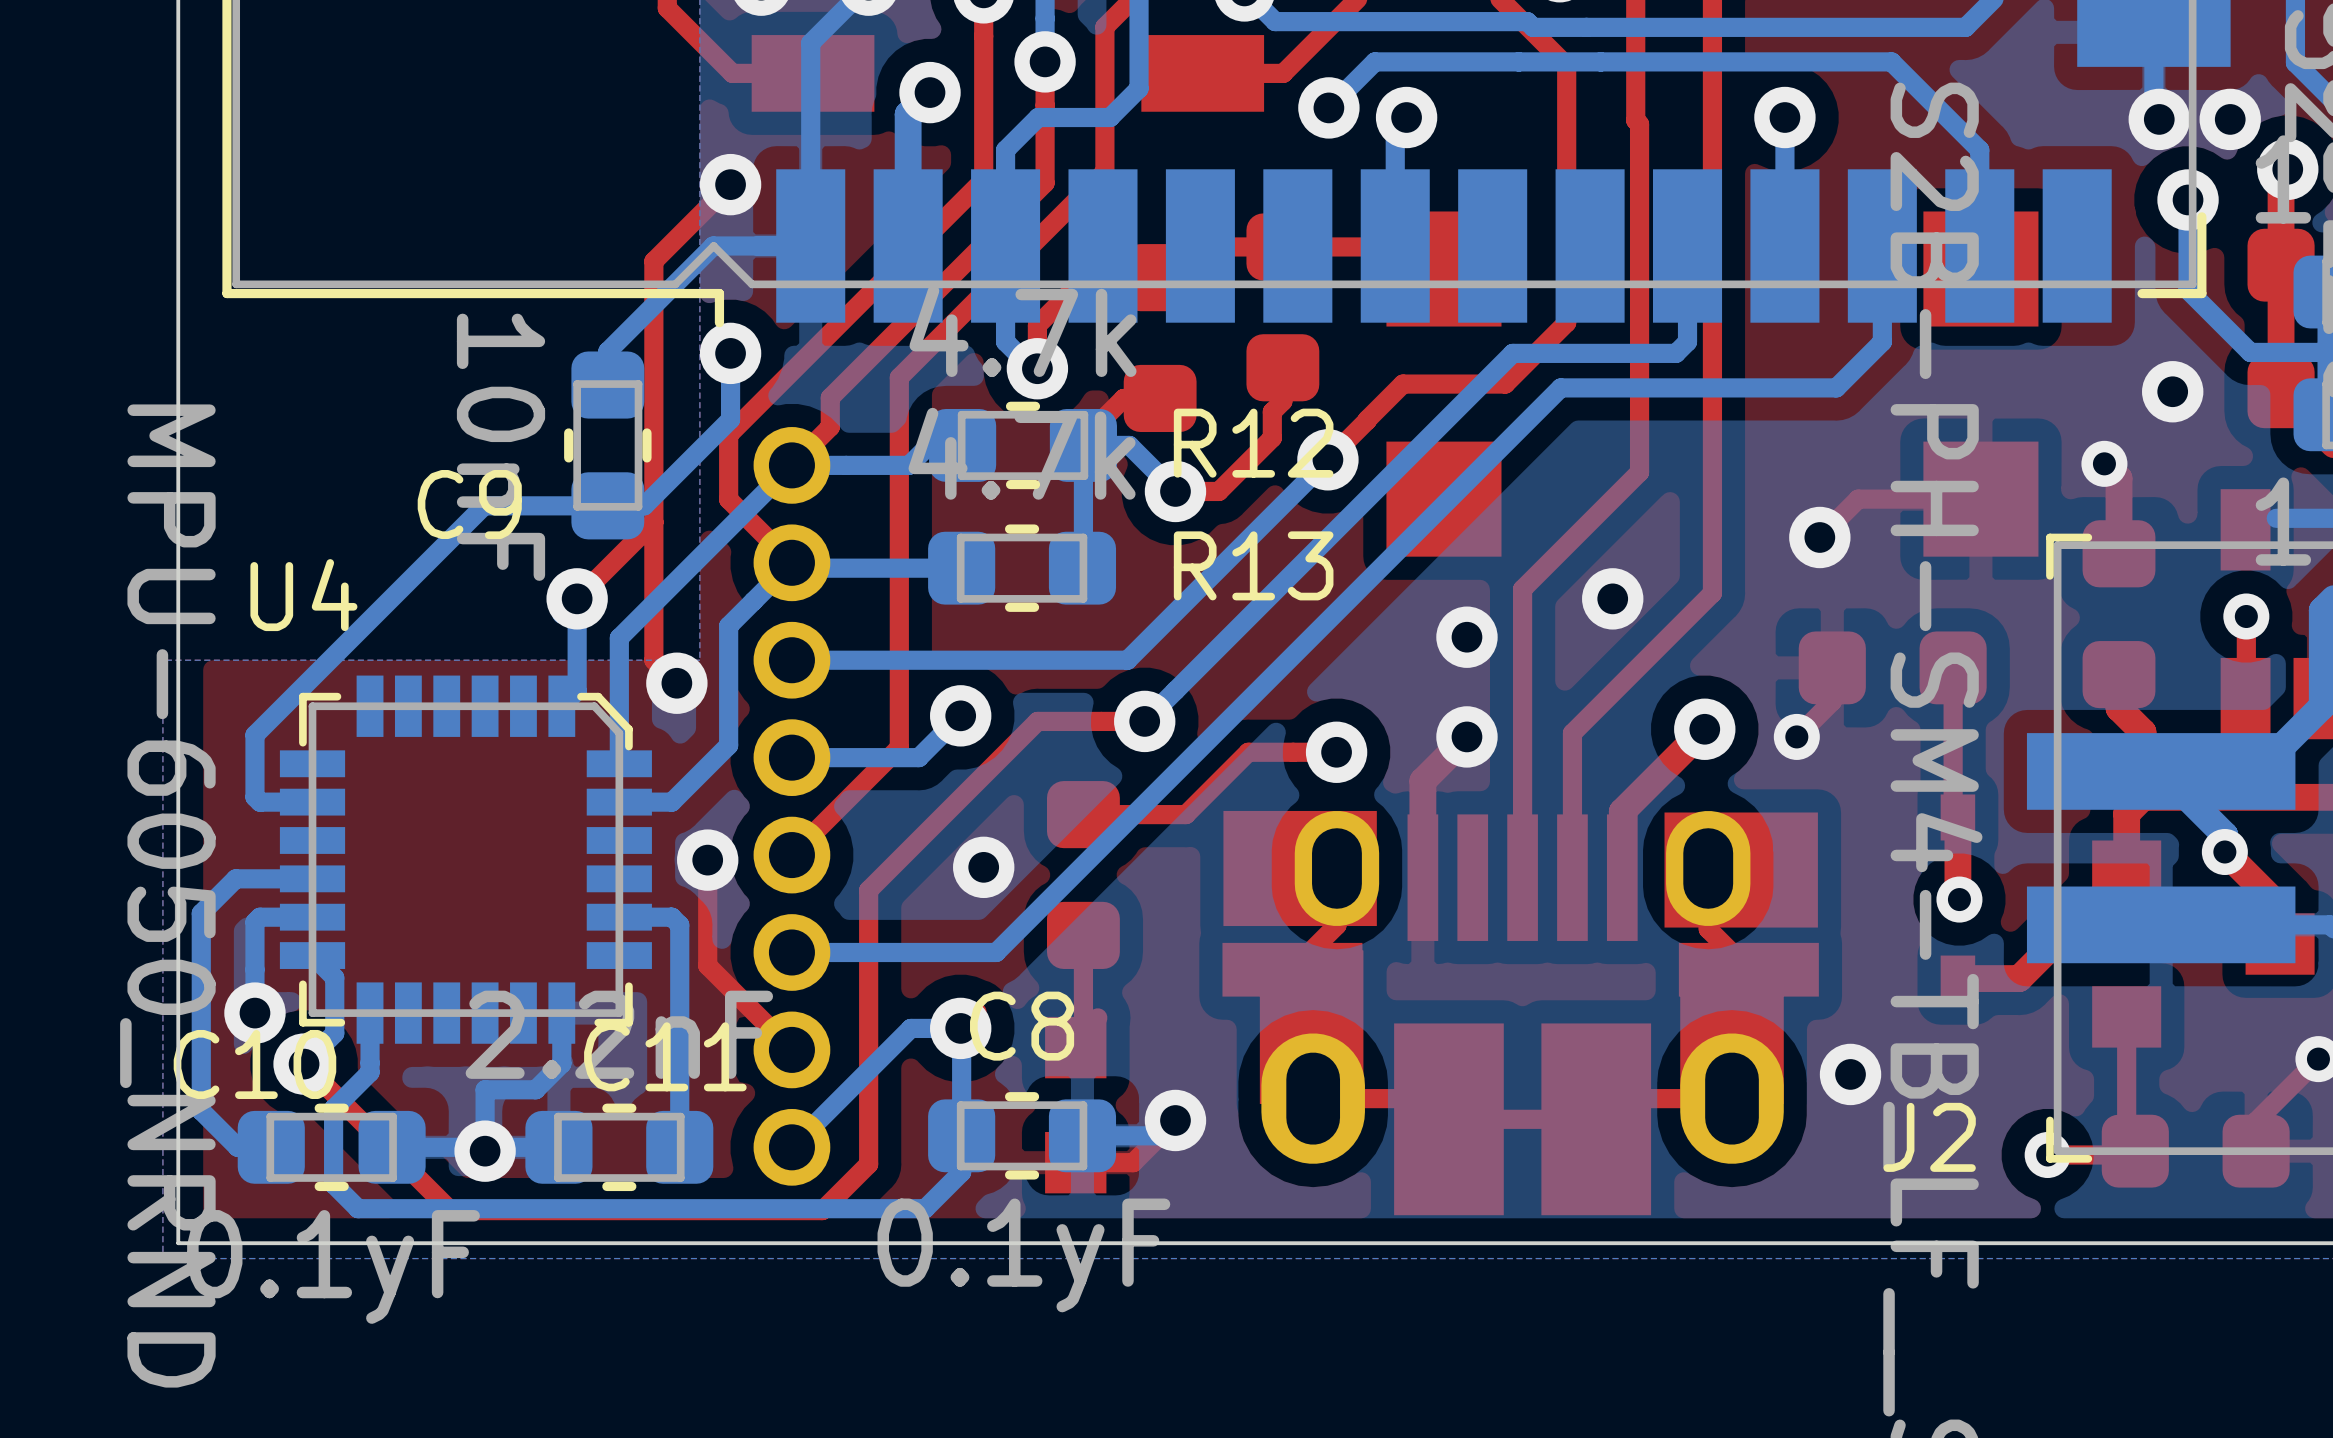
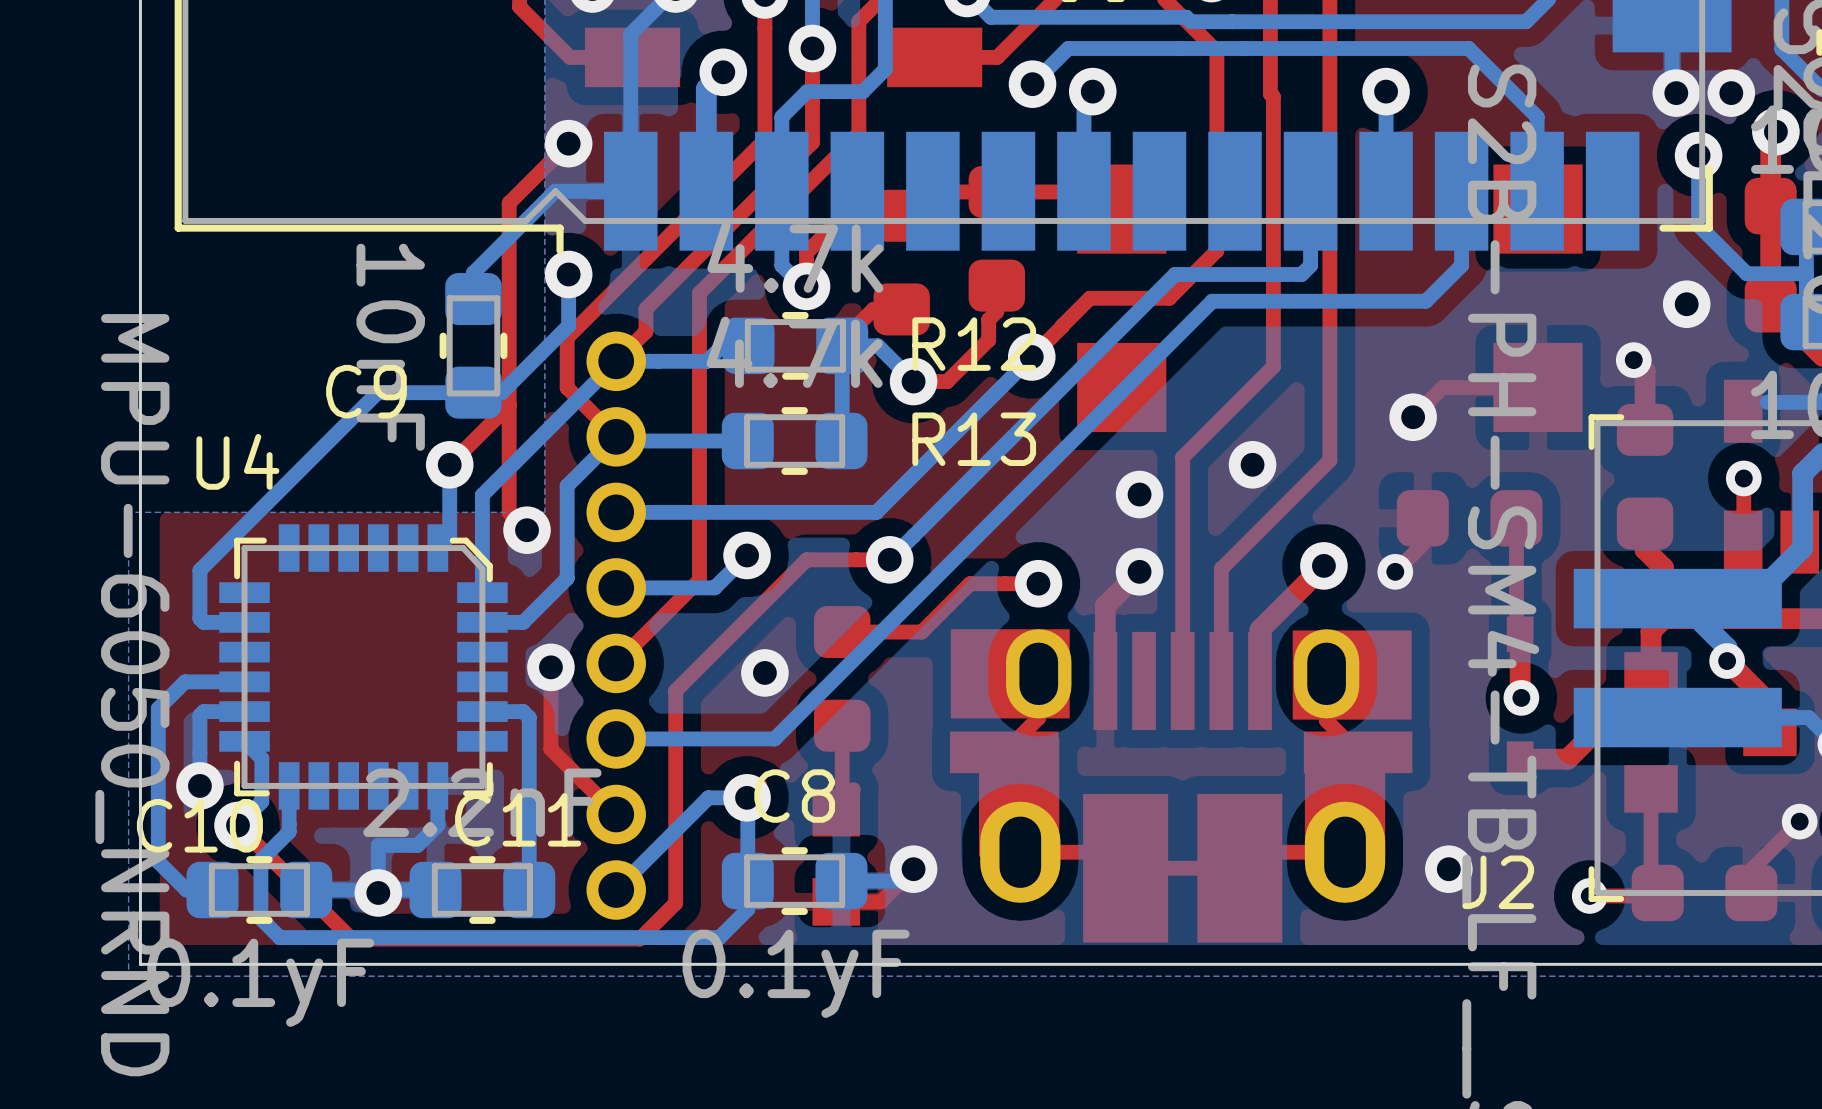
via position: (1850, 1074) -> (1448, 869)

